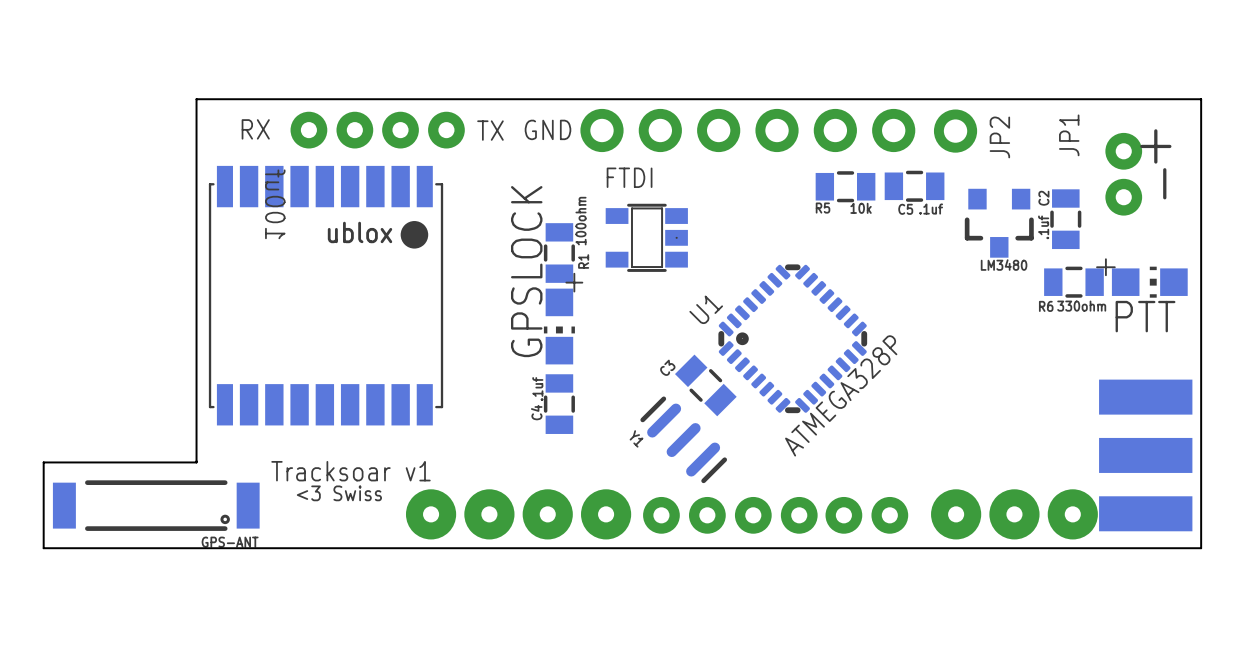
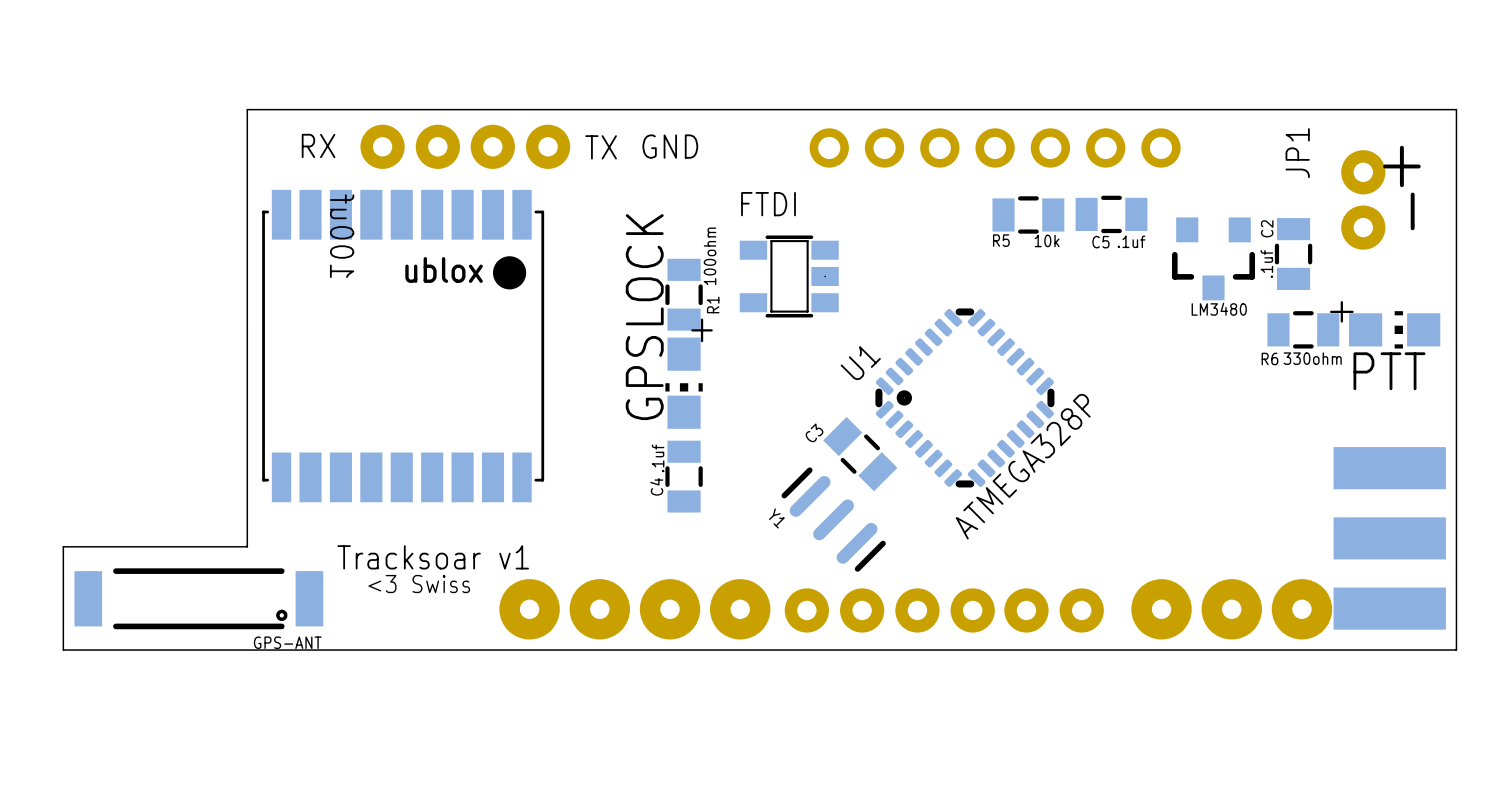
part: (747, 130) -> none
part: none -> (995, 147)
JP2: (955, 131) -> none

